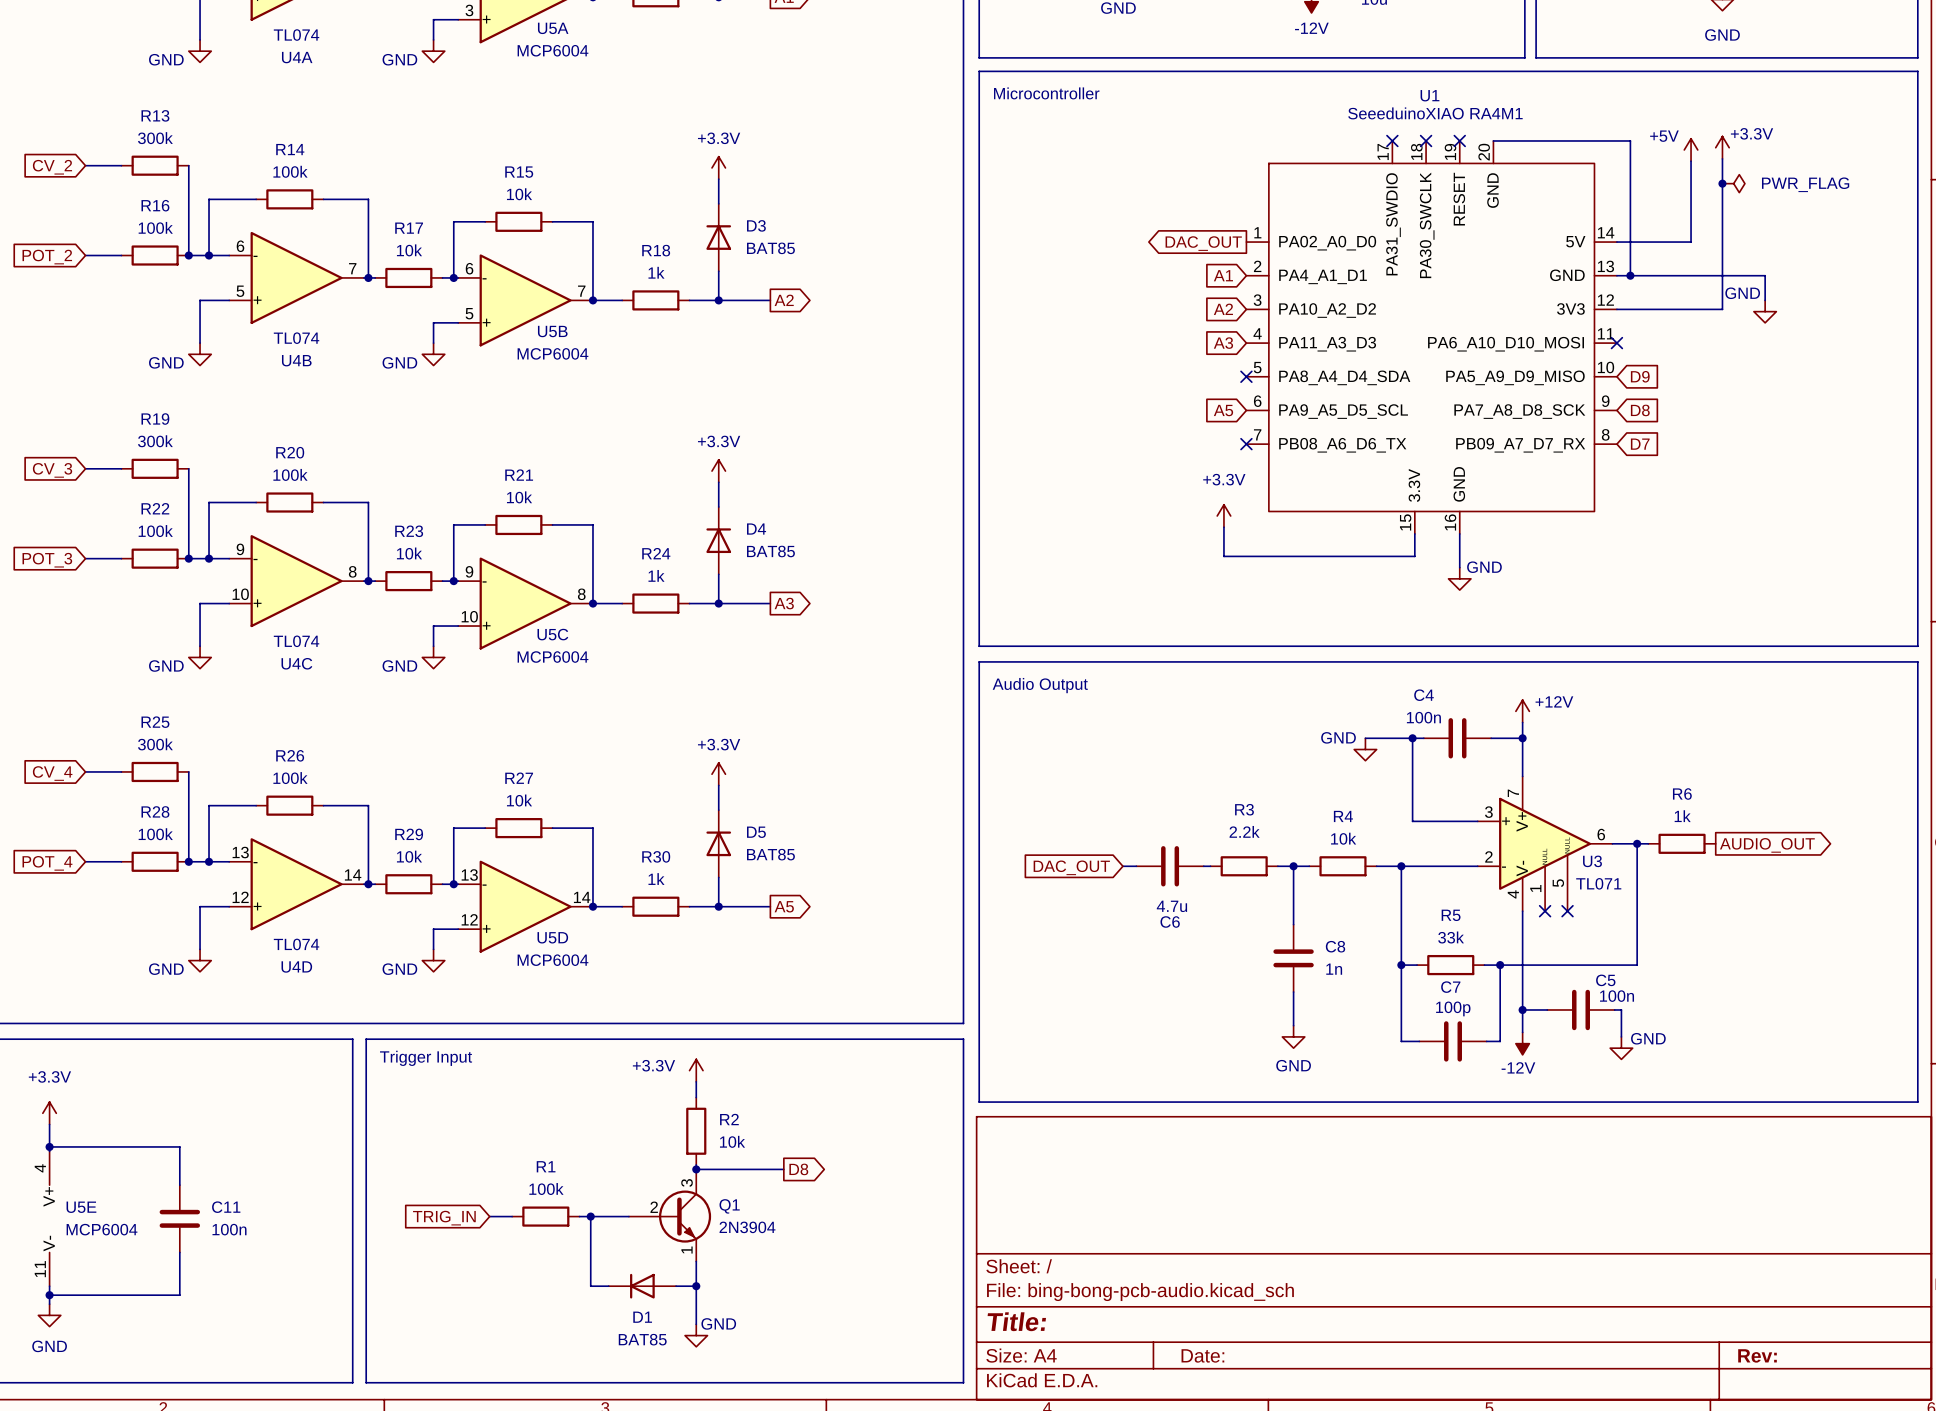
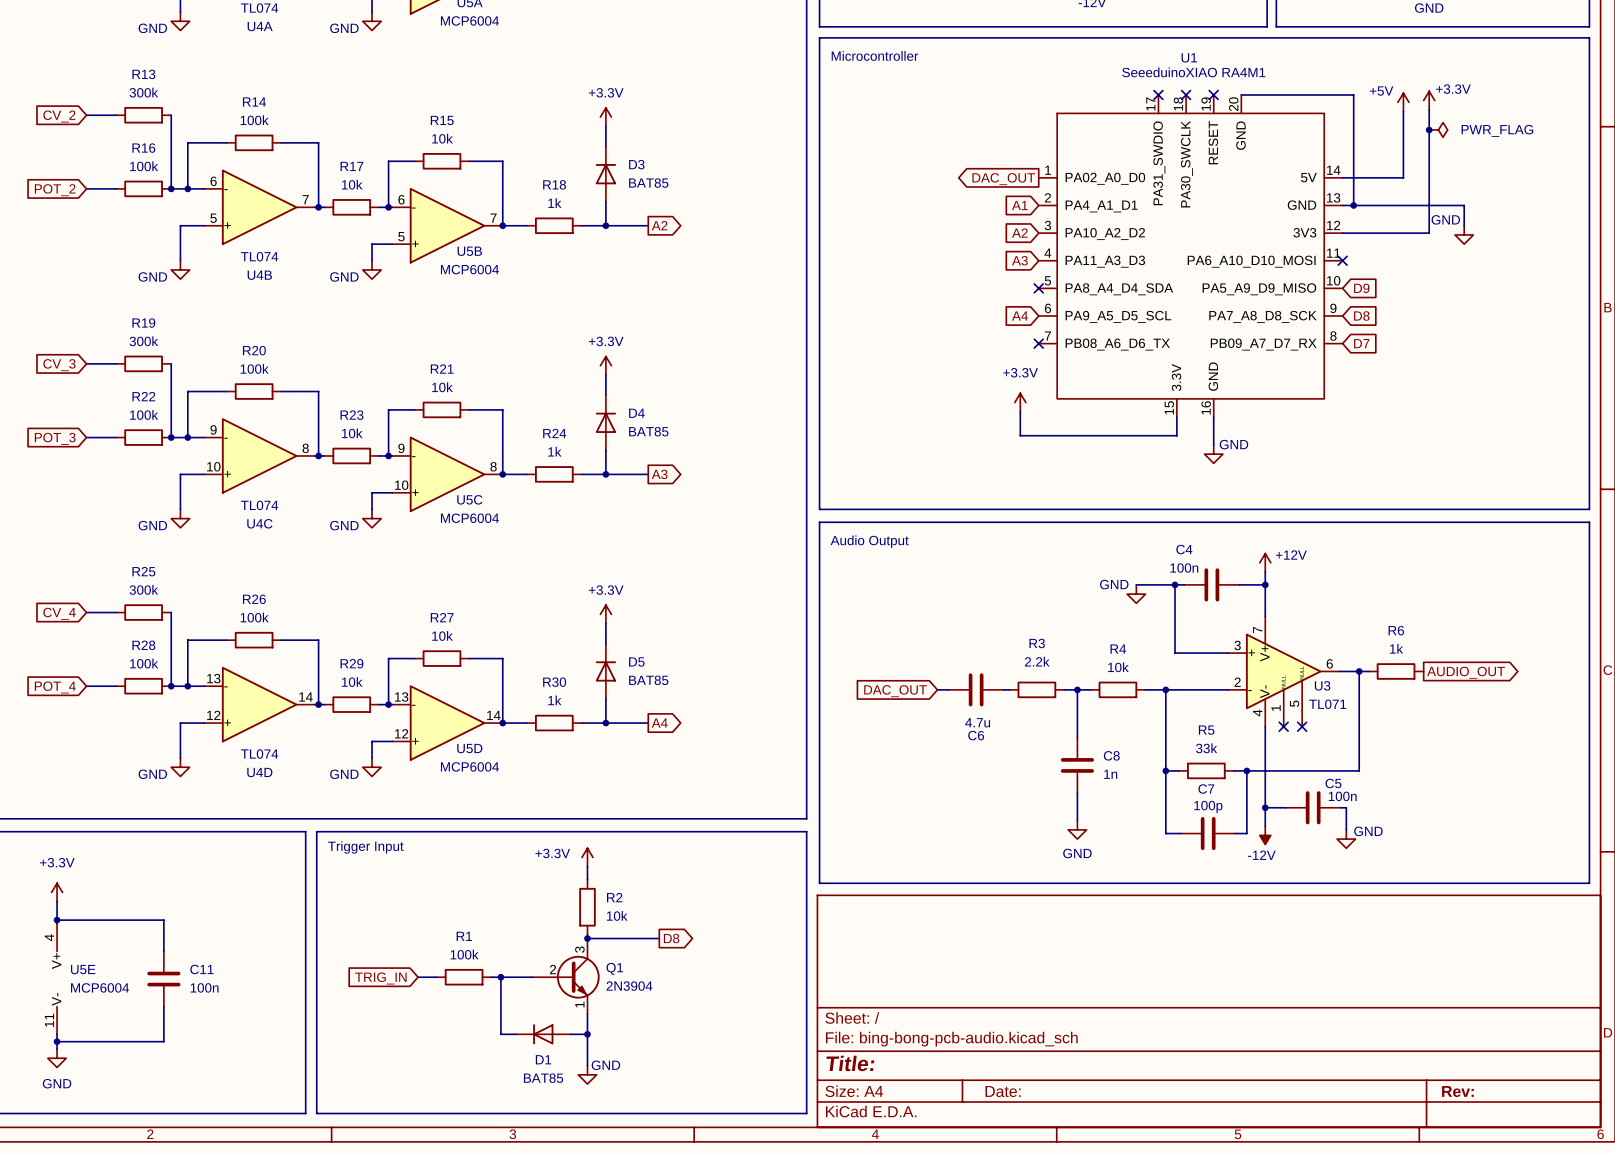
global label: A5 (1223, 410) -> A4 (1020, 316)
global label: A5 (784, 906) -> A4 (659, 723)

